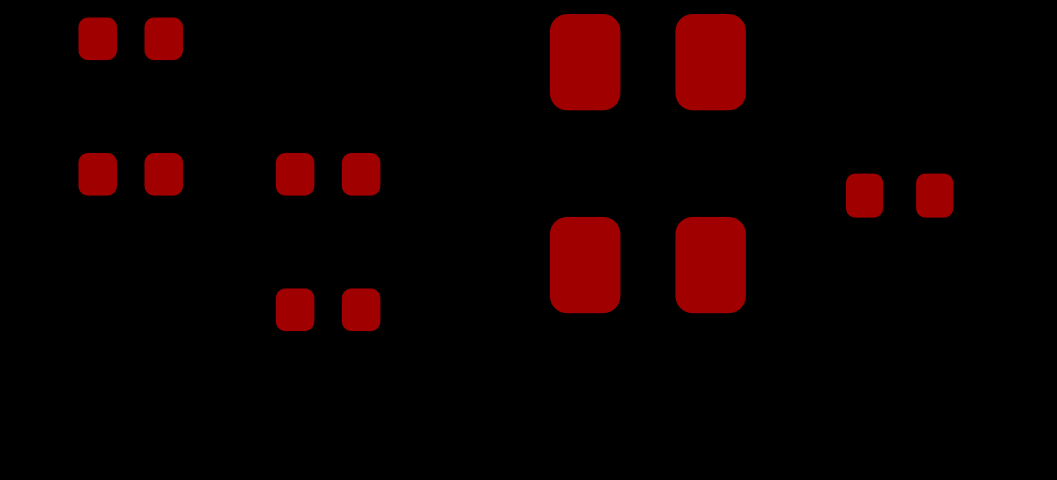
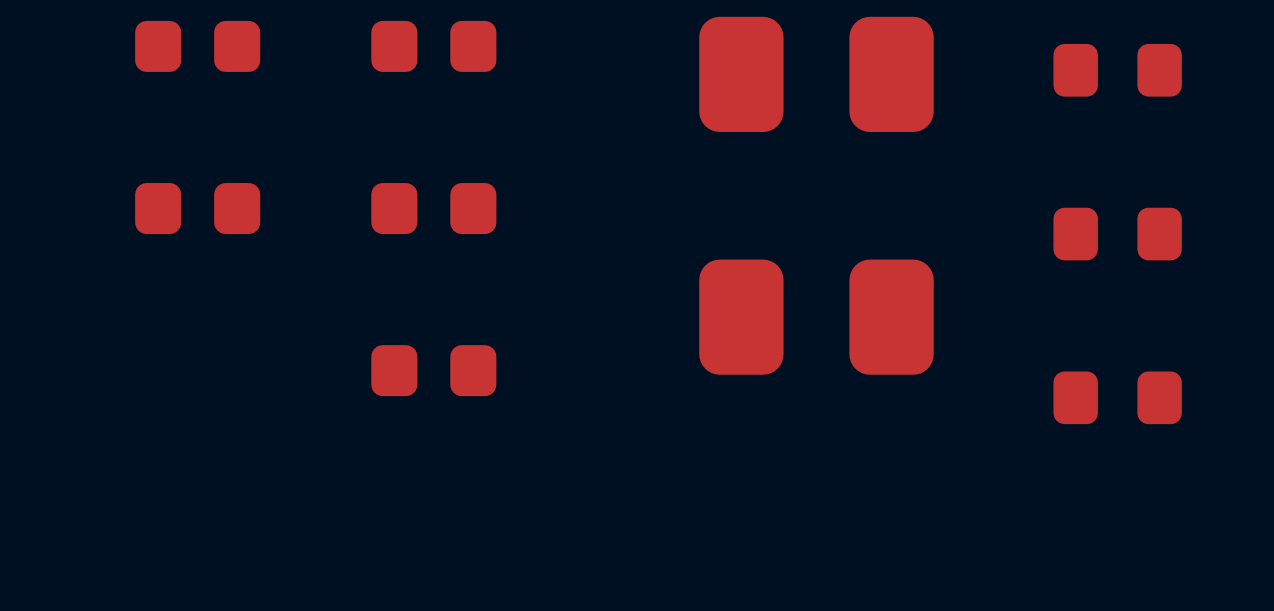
part: none -> (433, 46)
part: none -> (1117, 70)
part: none -> (1117, 397)

